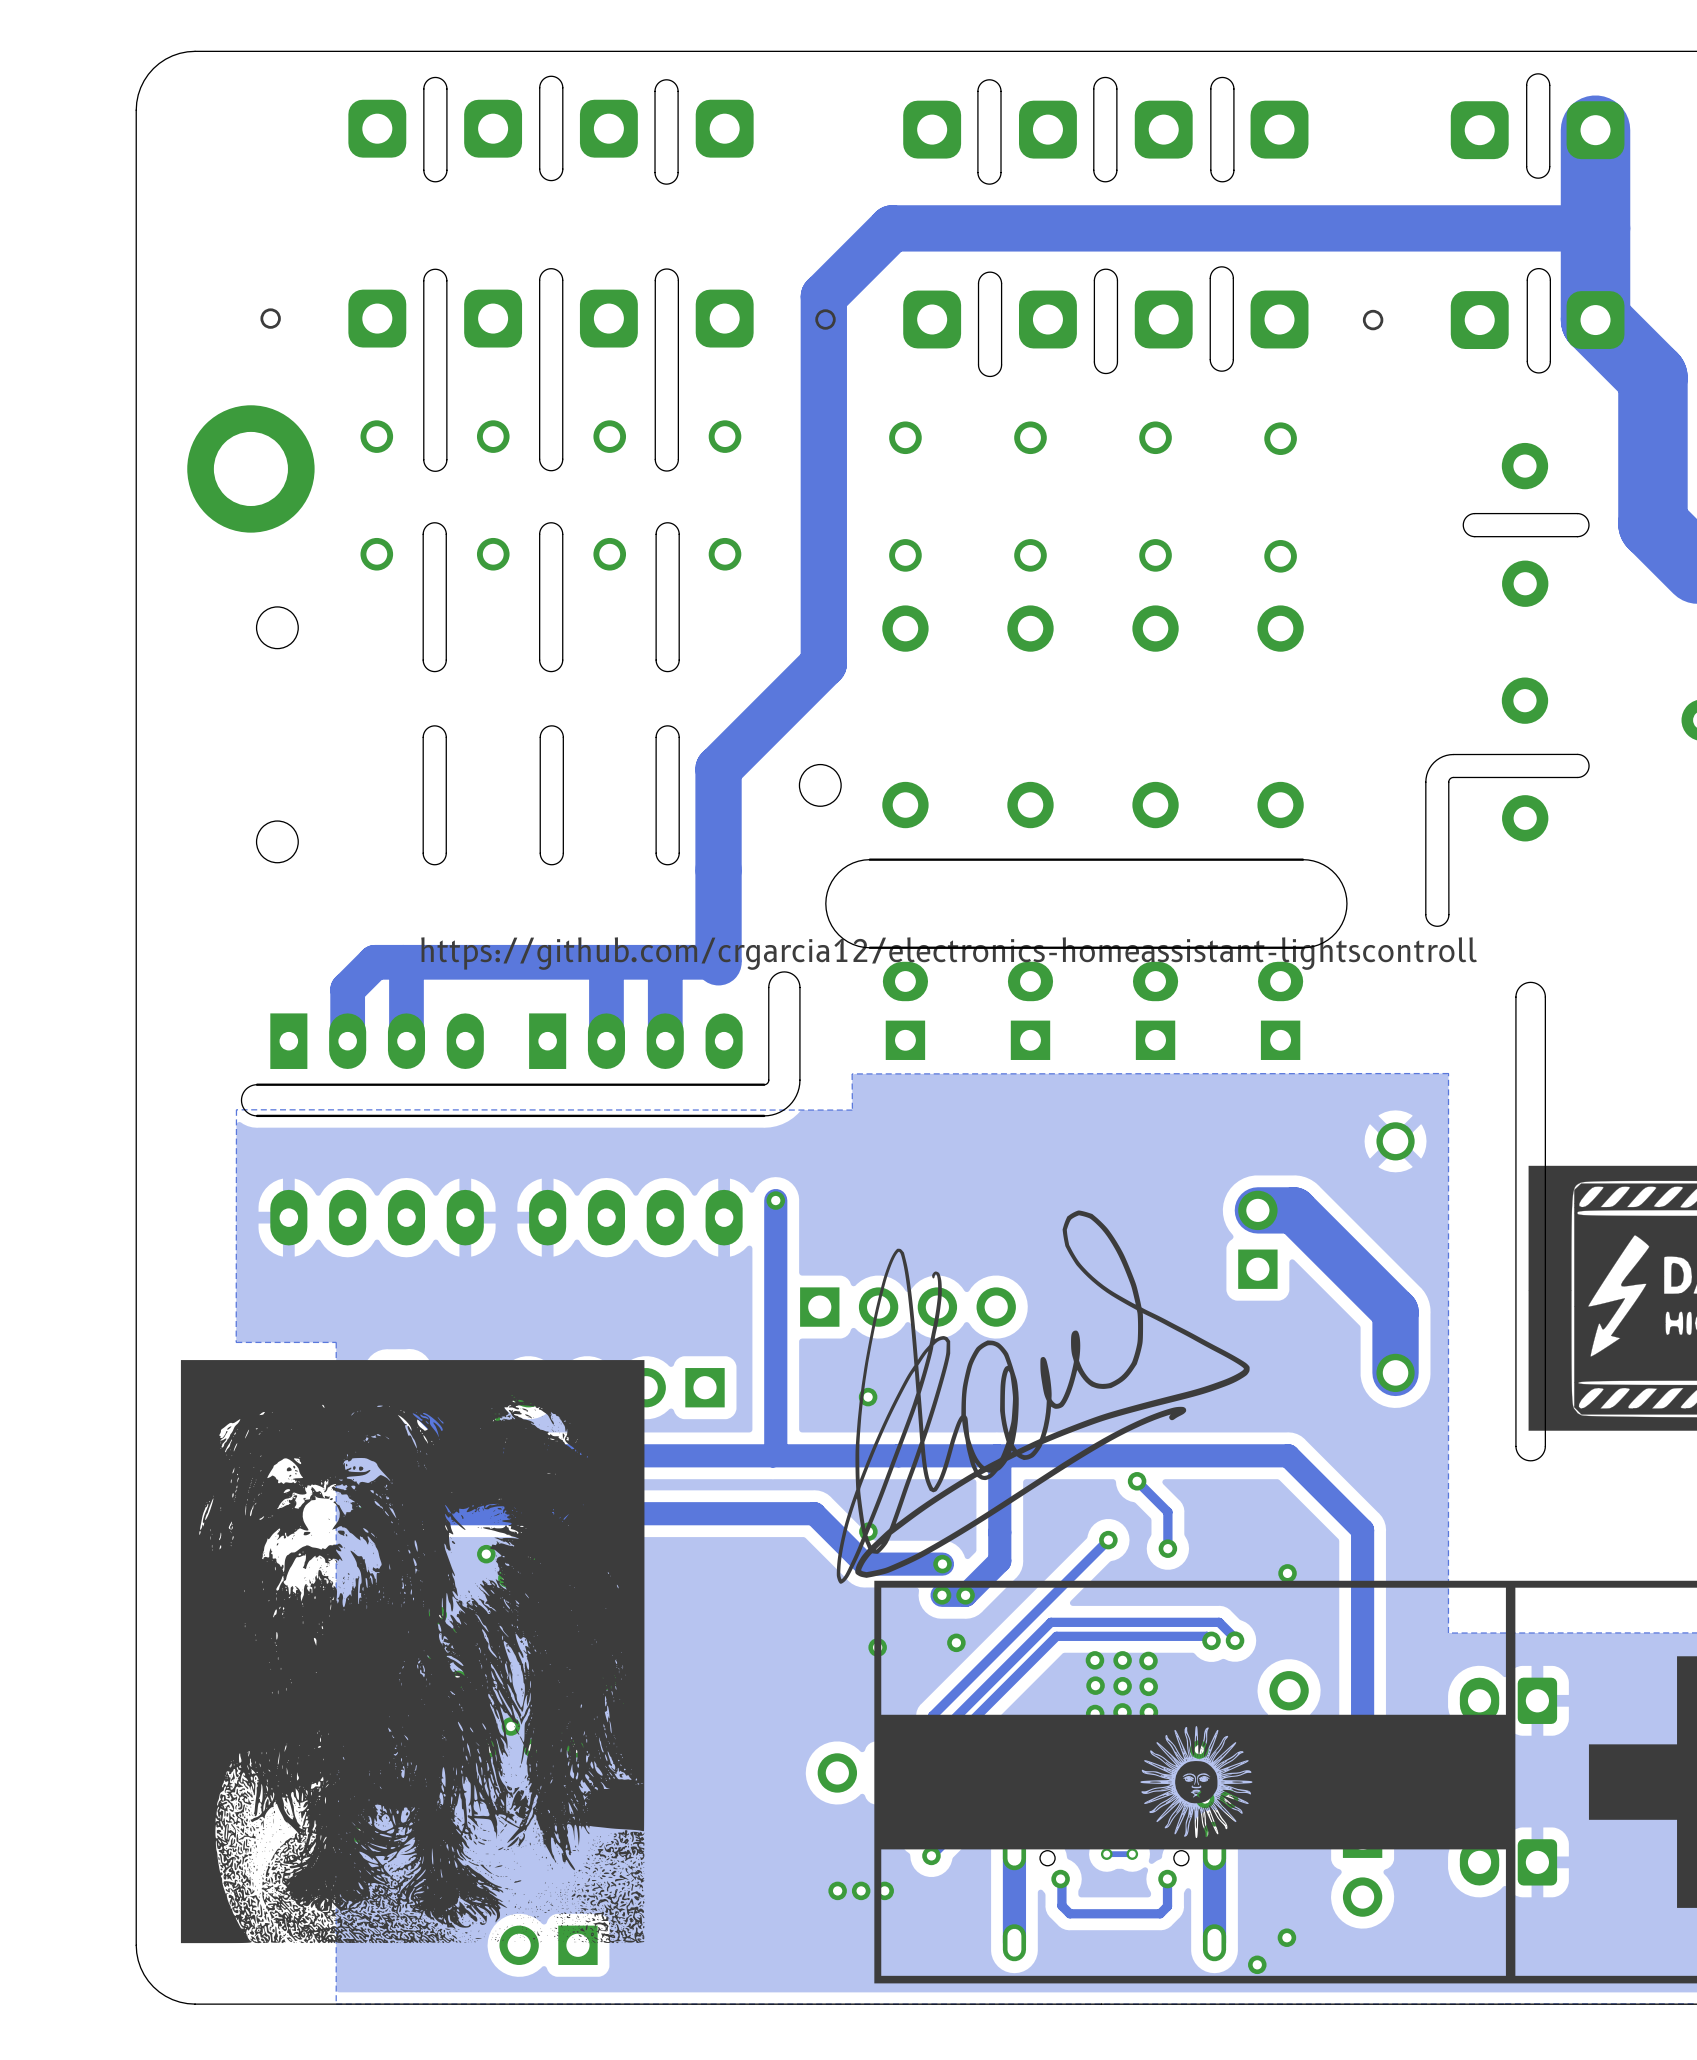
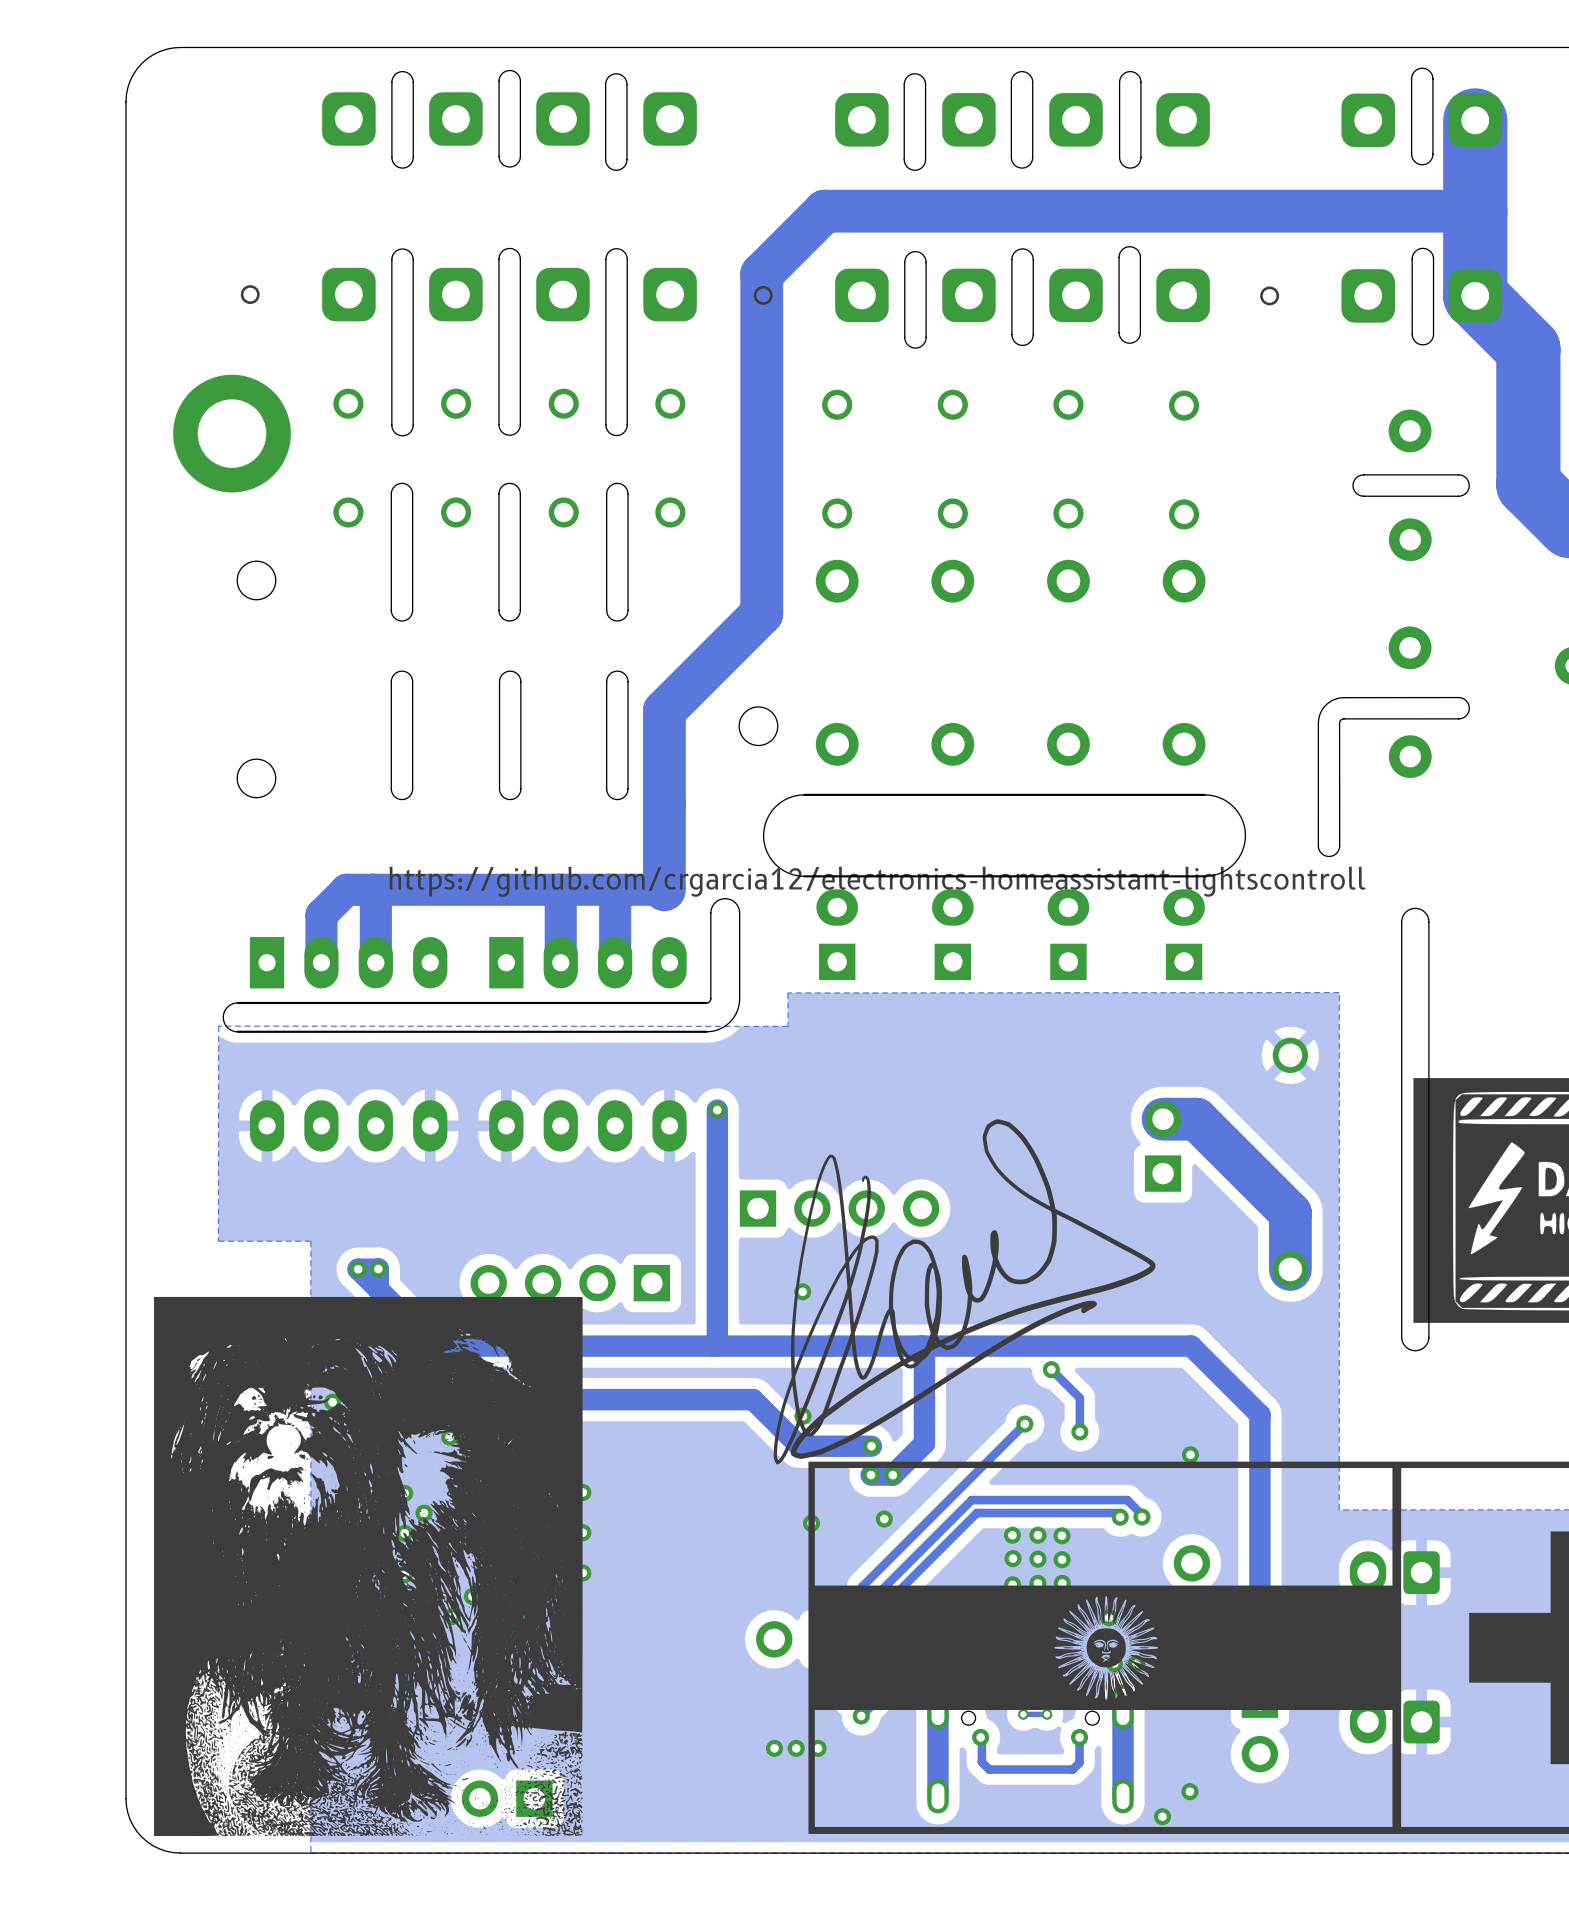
part position: (412, 1651) -> (368, 1566)

